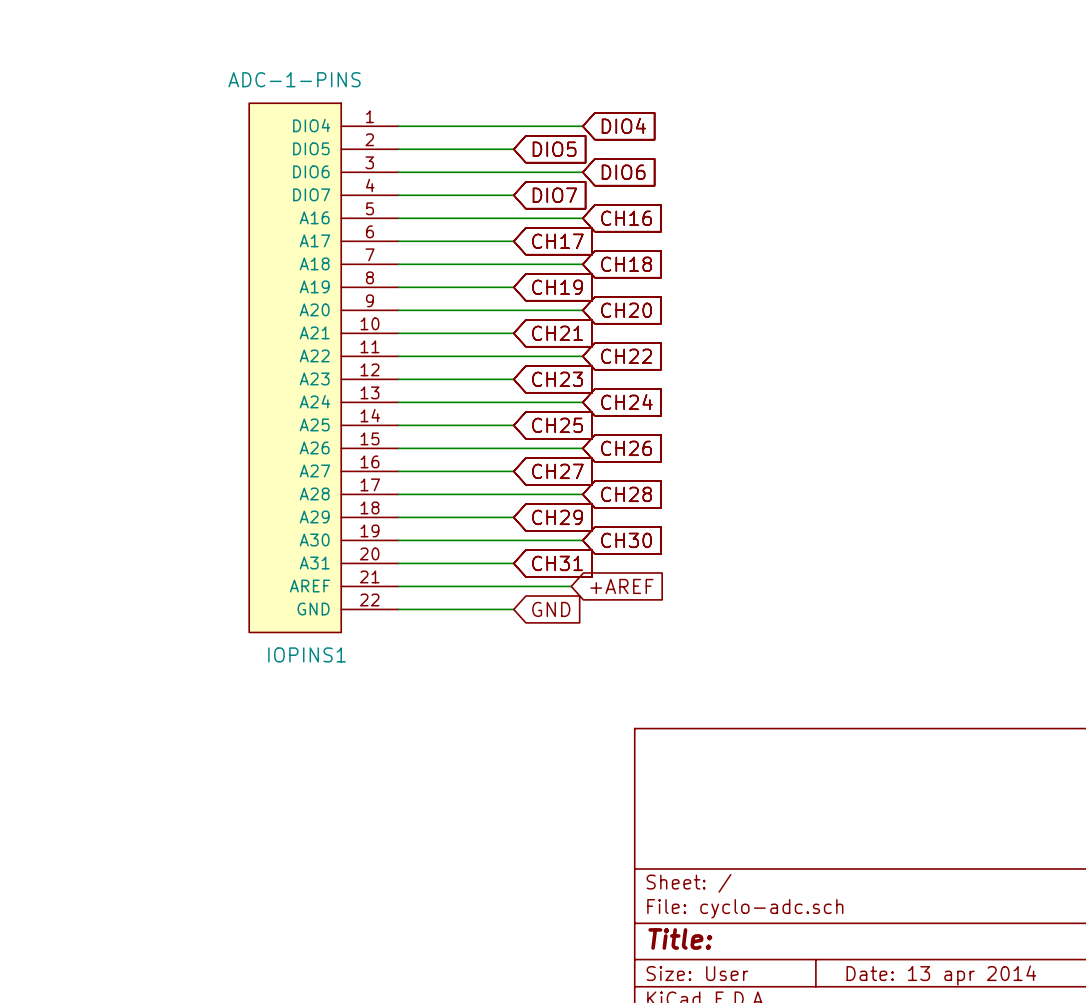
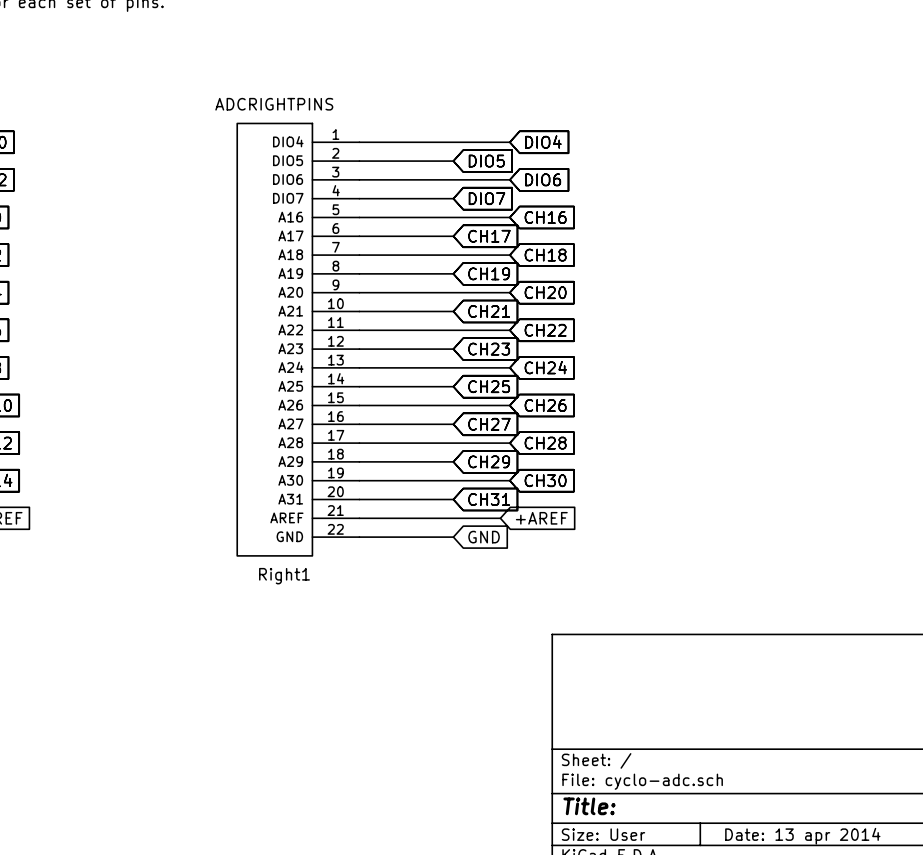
IOPINS1 value: ADC-1-PINS (294, 79) -> ADCRIGHTPINS (274, 104)
IOPINS1 name: IOPINS1 (307, 654) -> Right1 (284, 576)

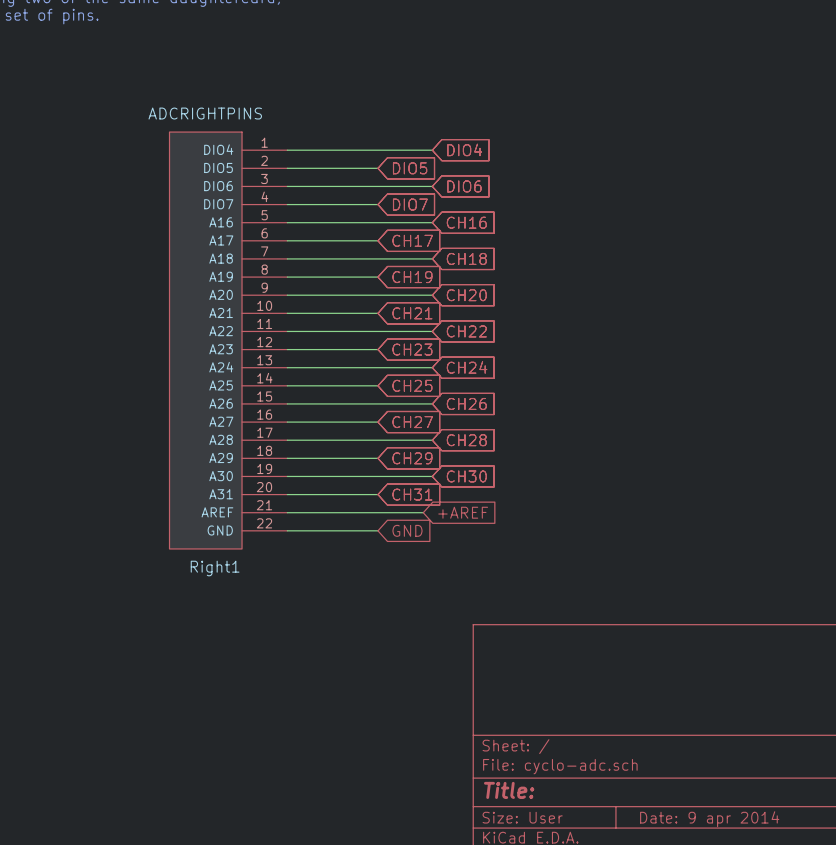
title block: Date: 13 apr 2014 (802, 836) -> Date: 9 apr 2014 (709, 819)

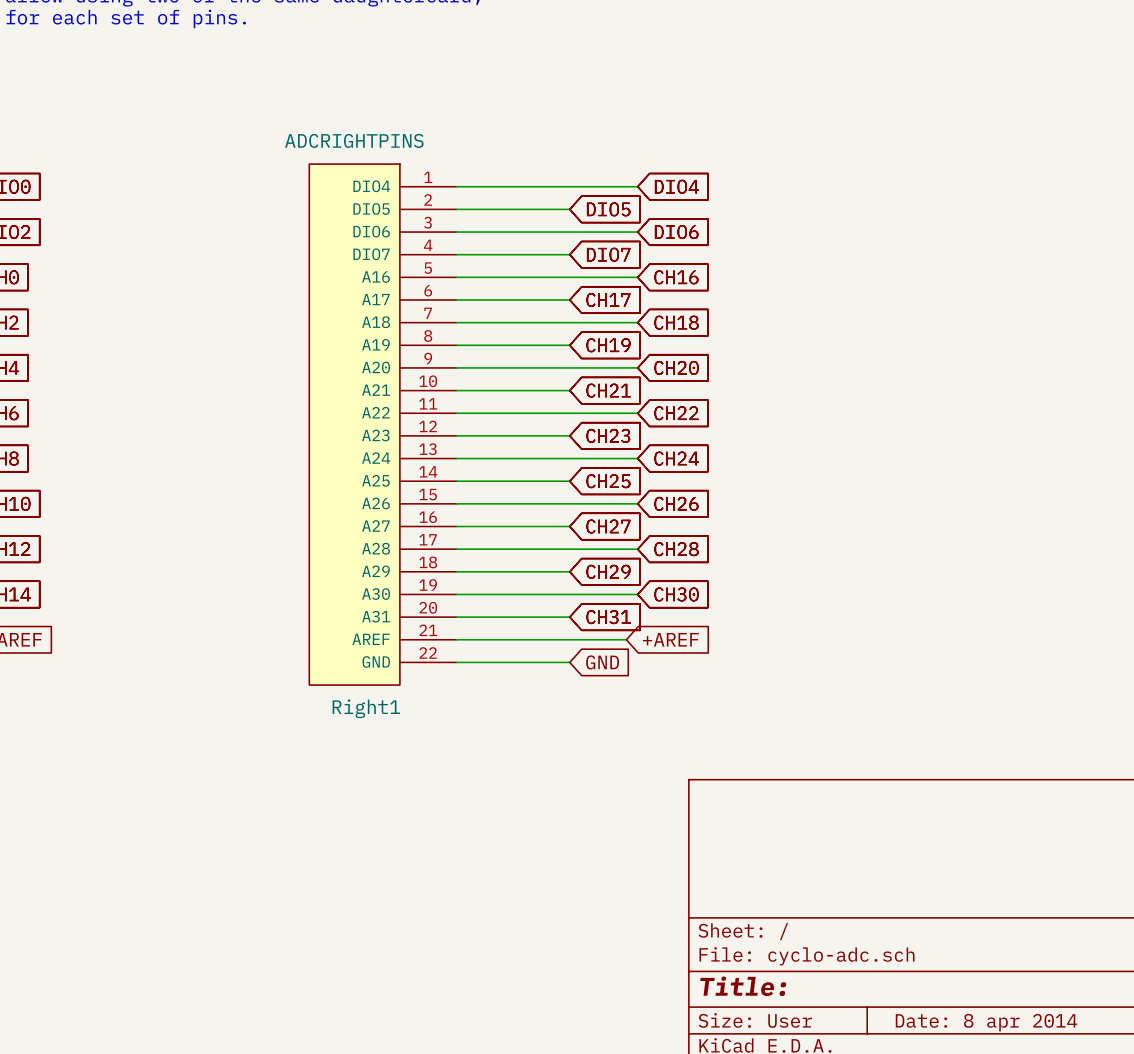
title block: Date: 9 apr 2014 (709, 819) -> Date: 8 apr 2014 (986, 1022)

